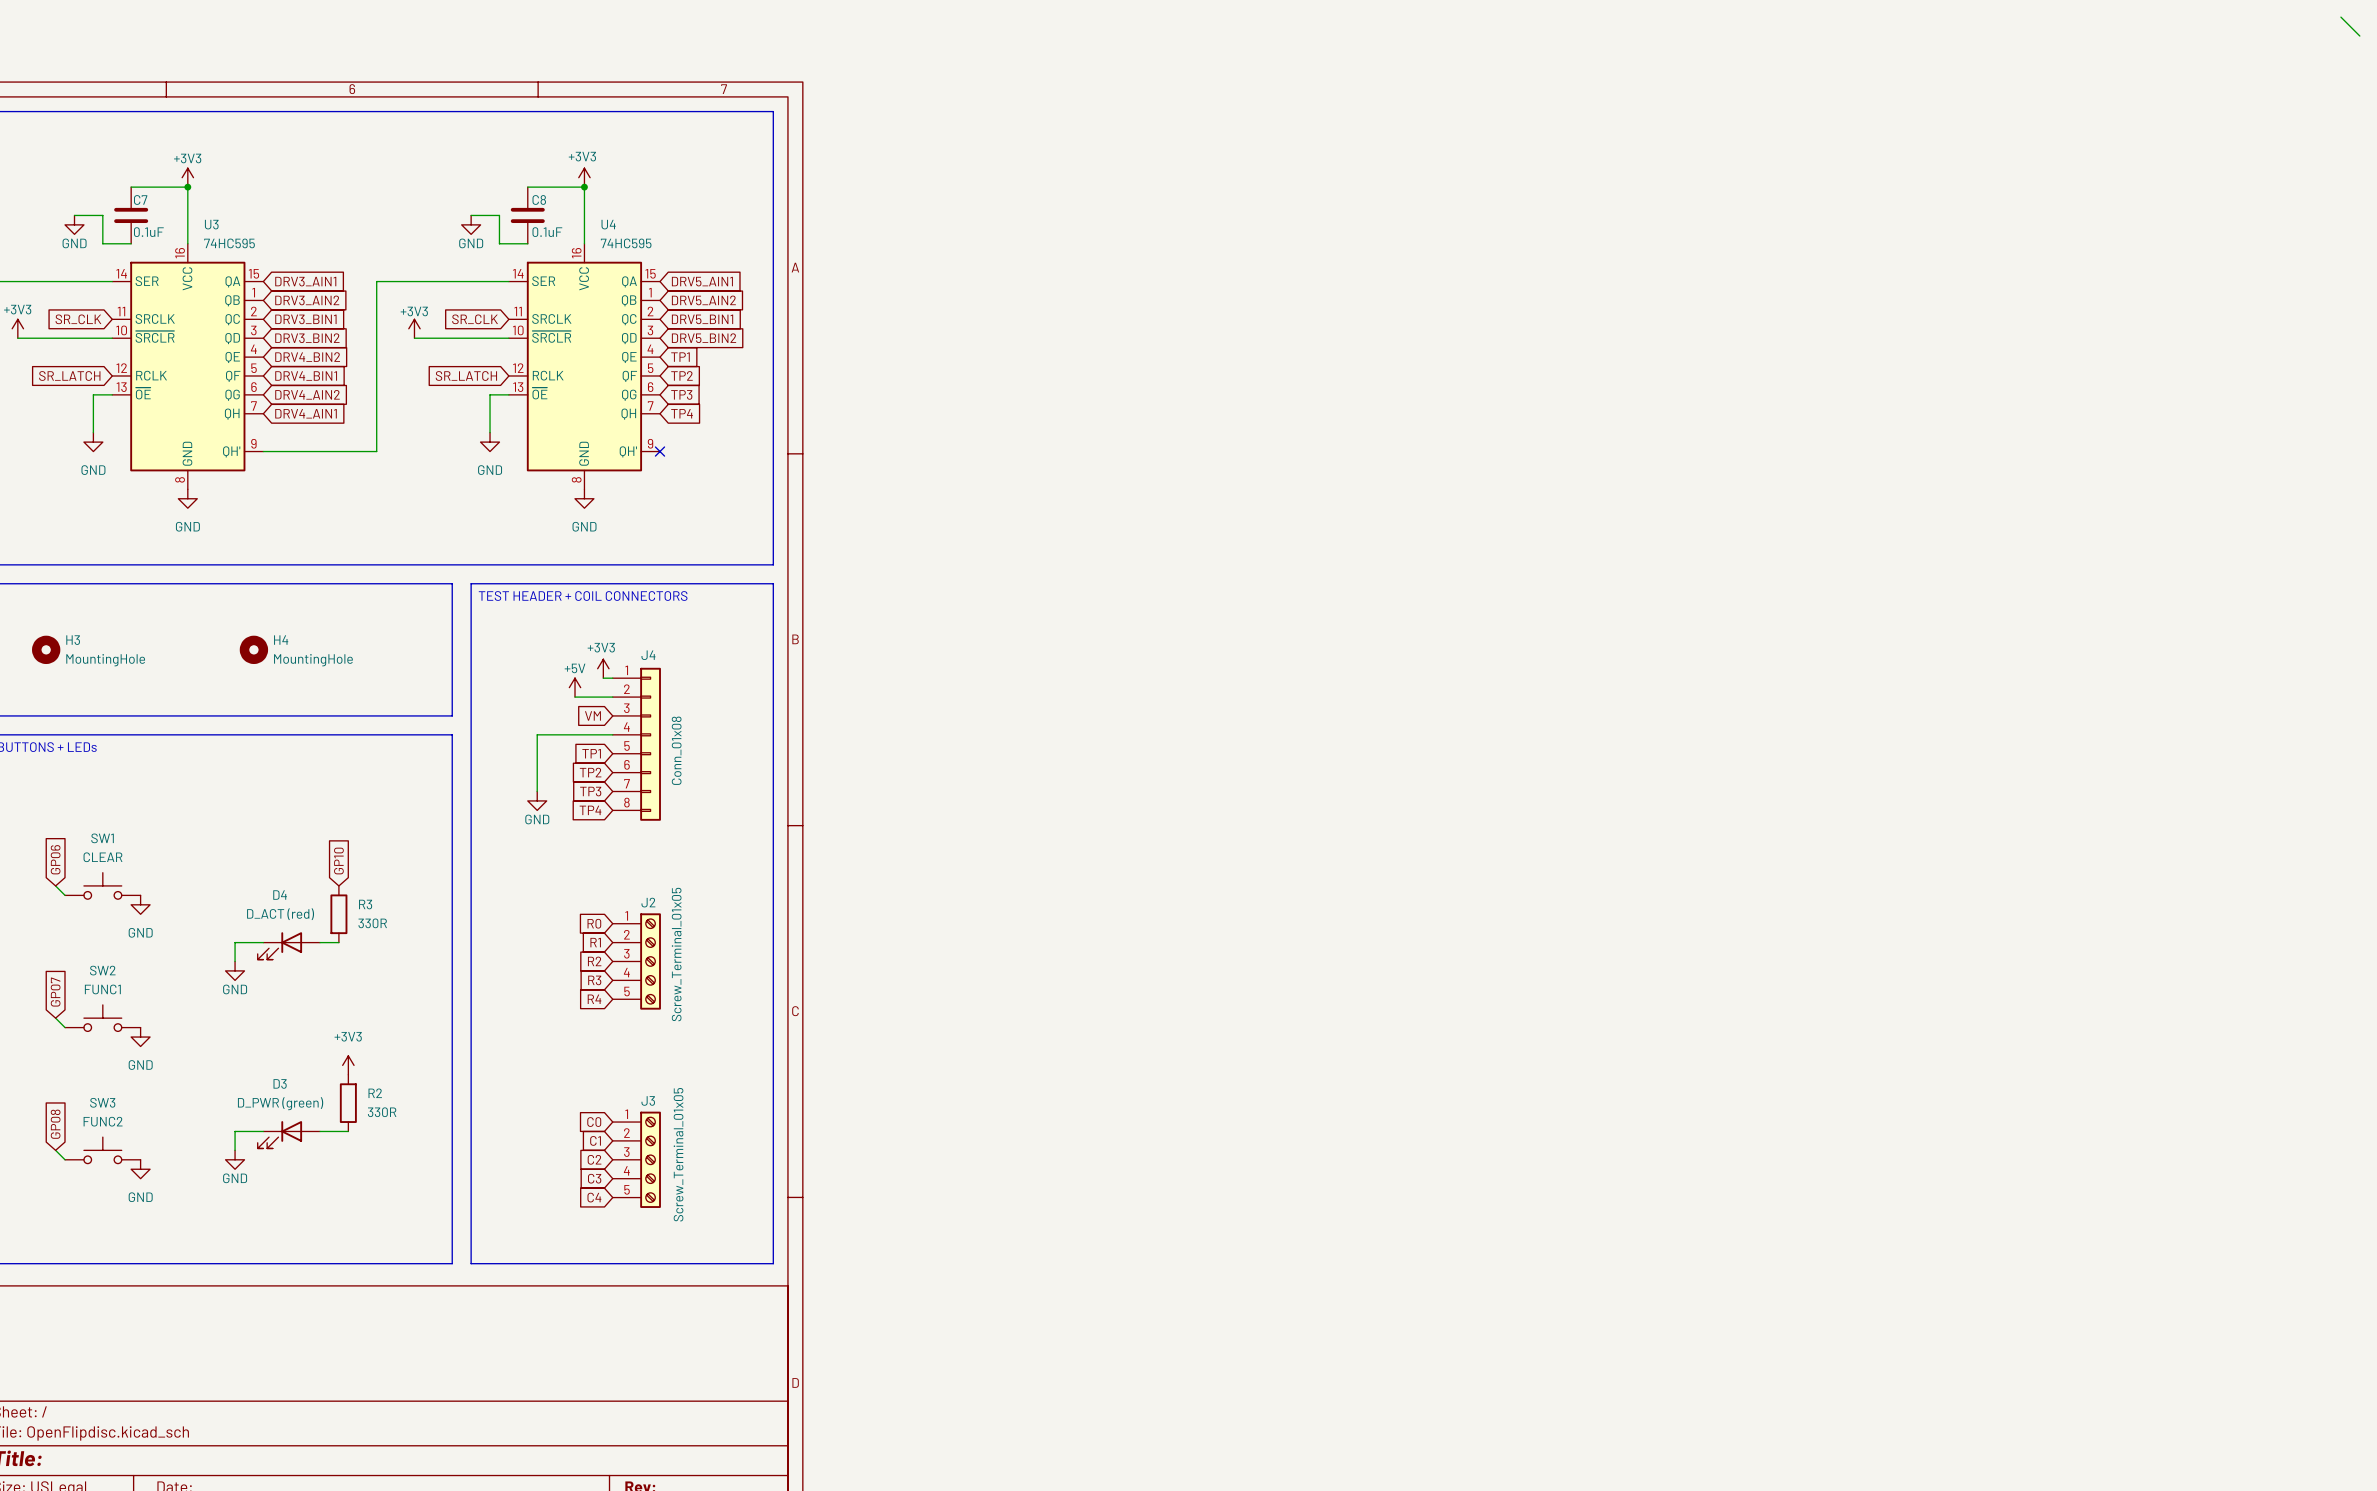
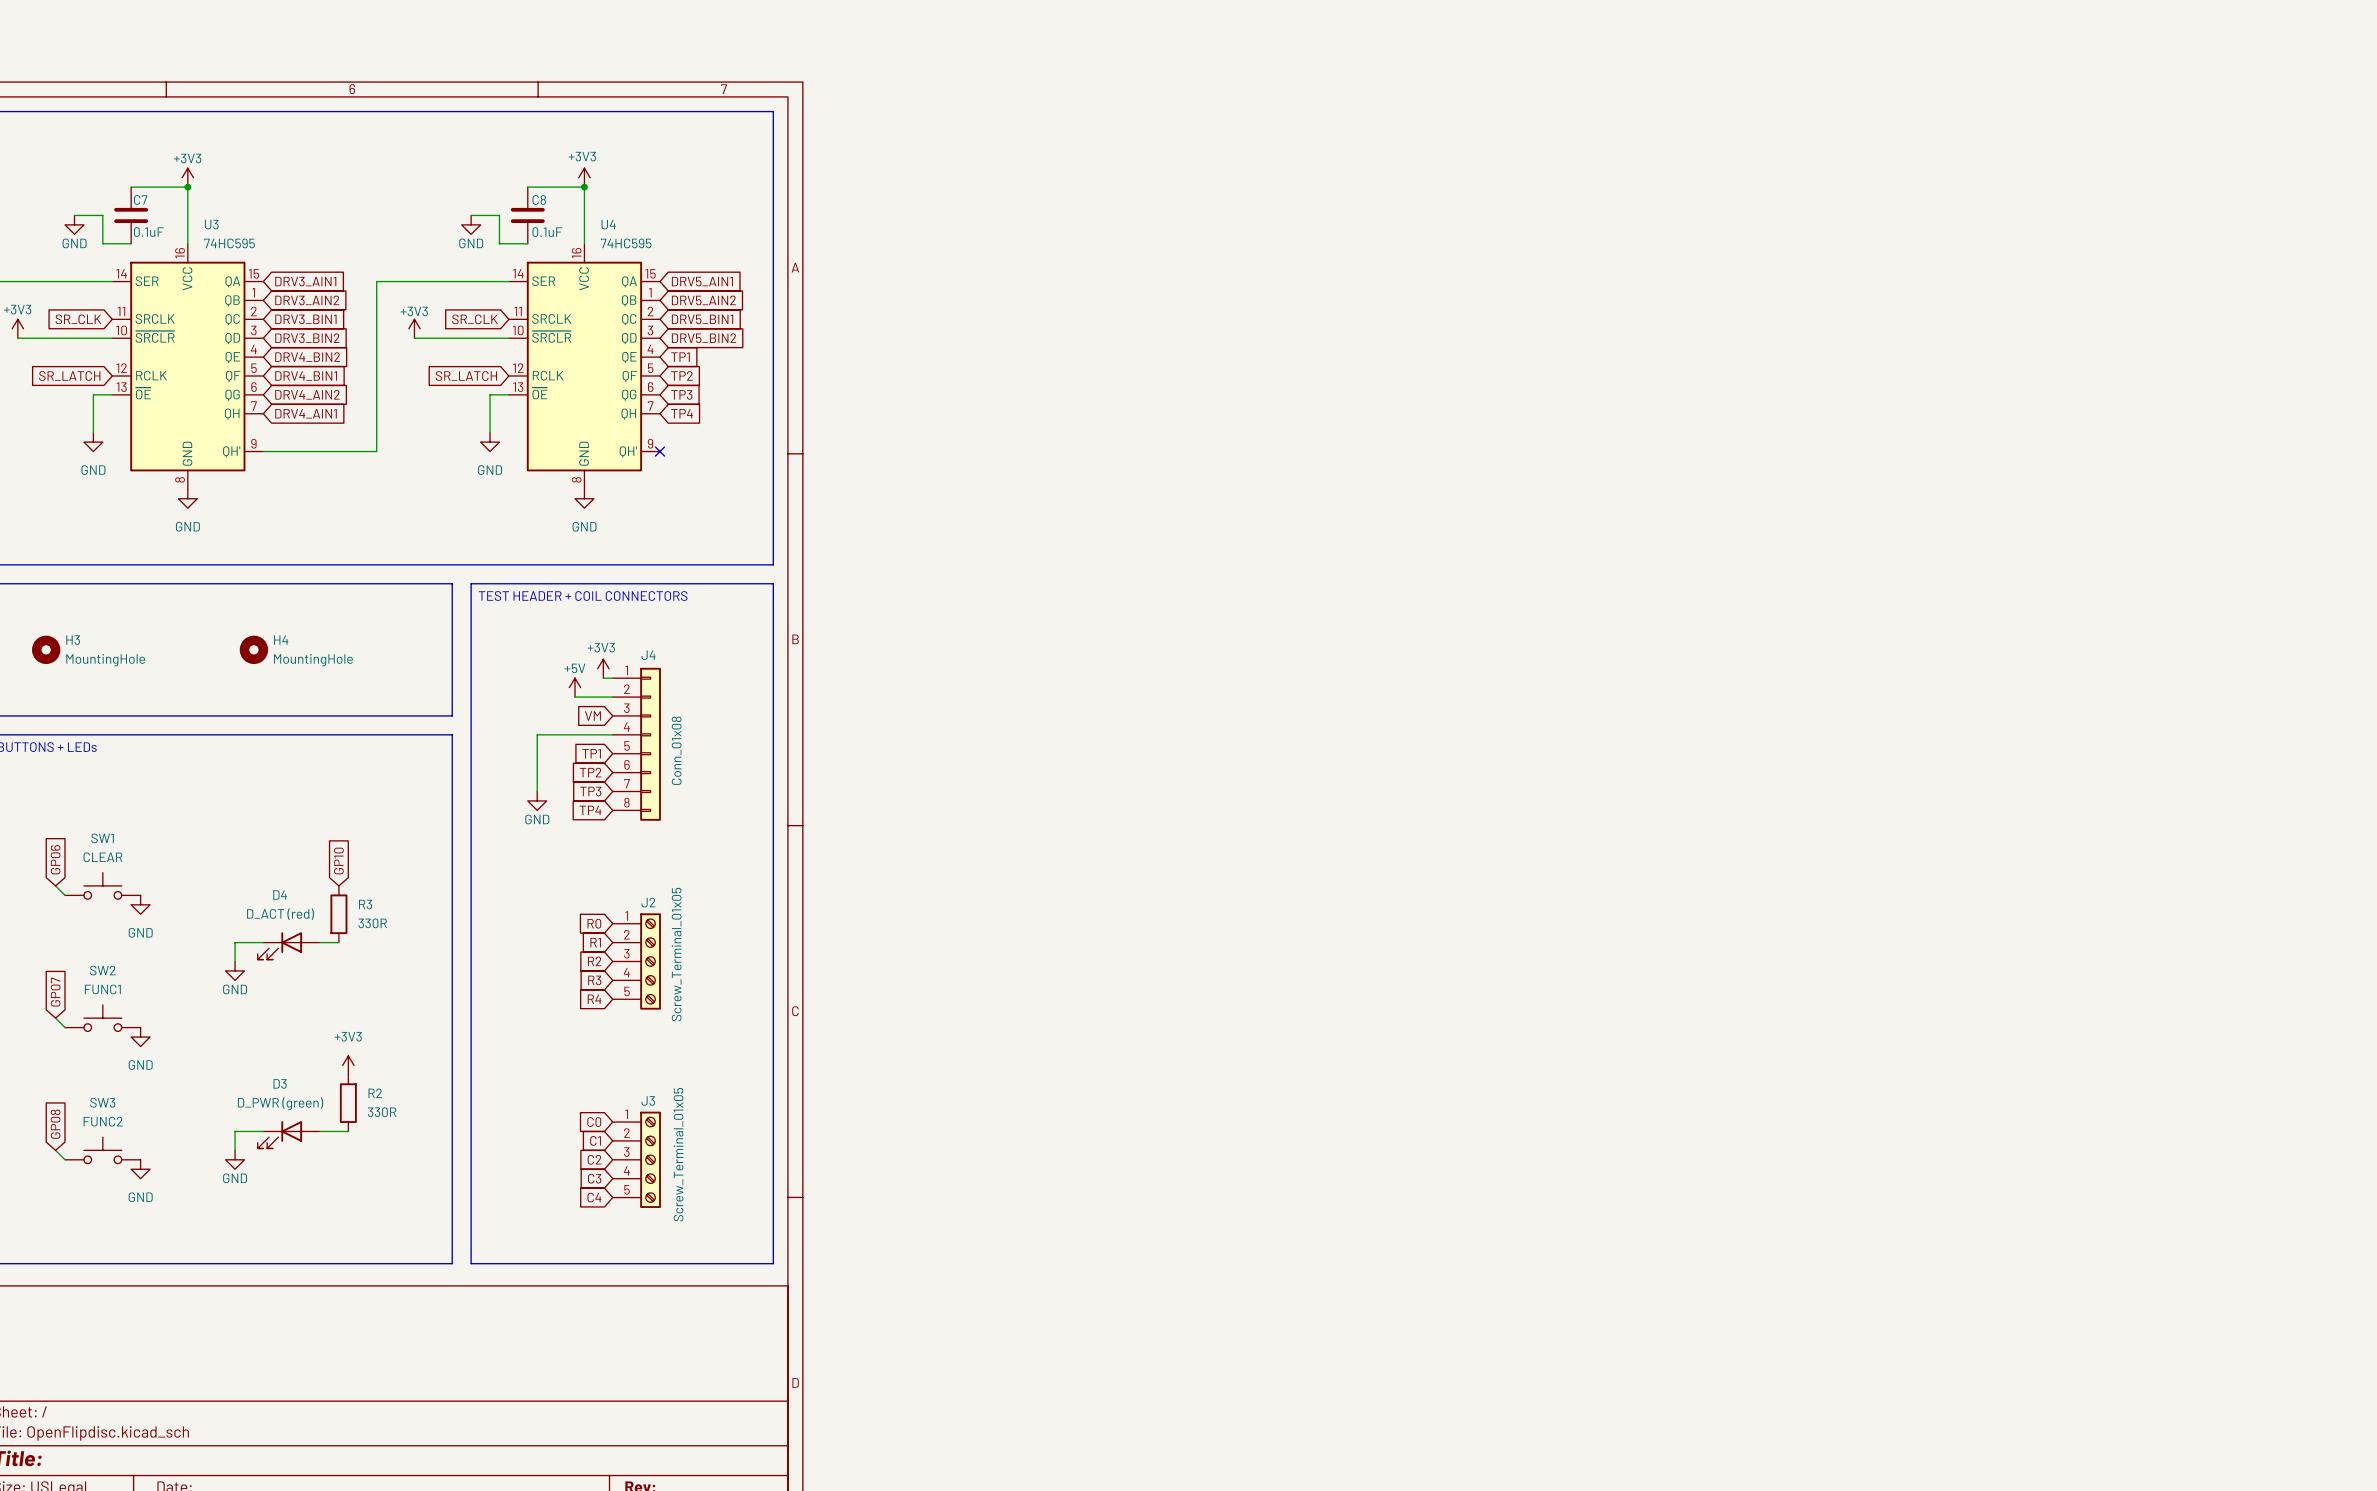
wire: (2340, 17) (2359, 36) -> none

